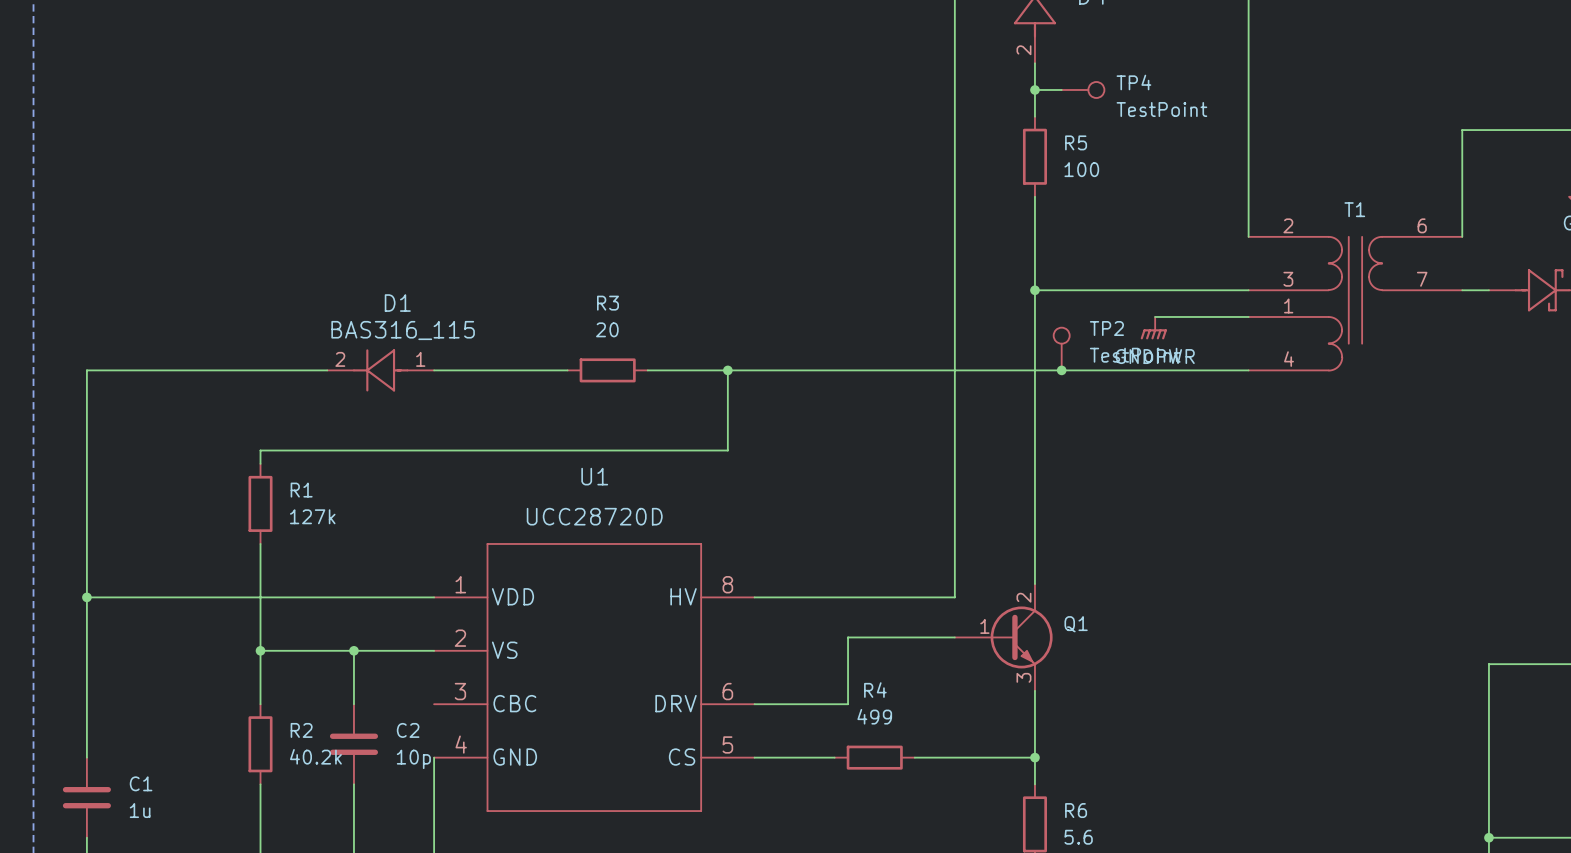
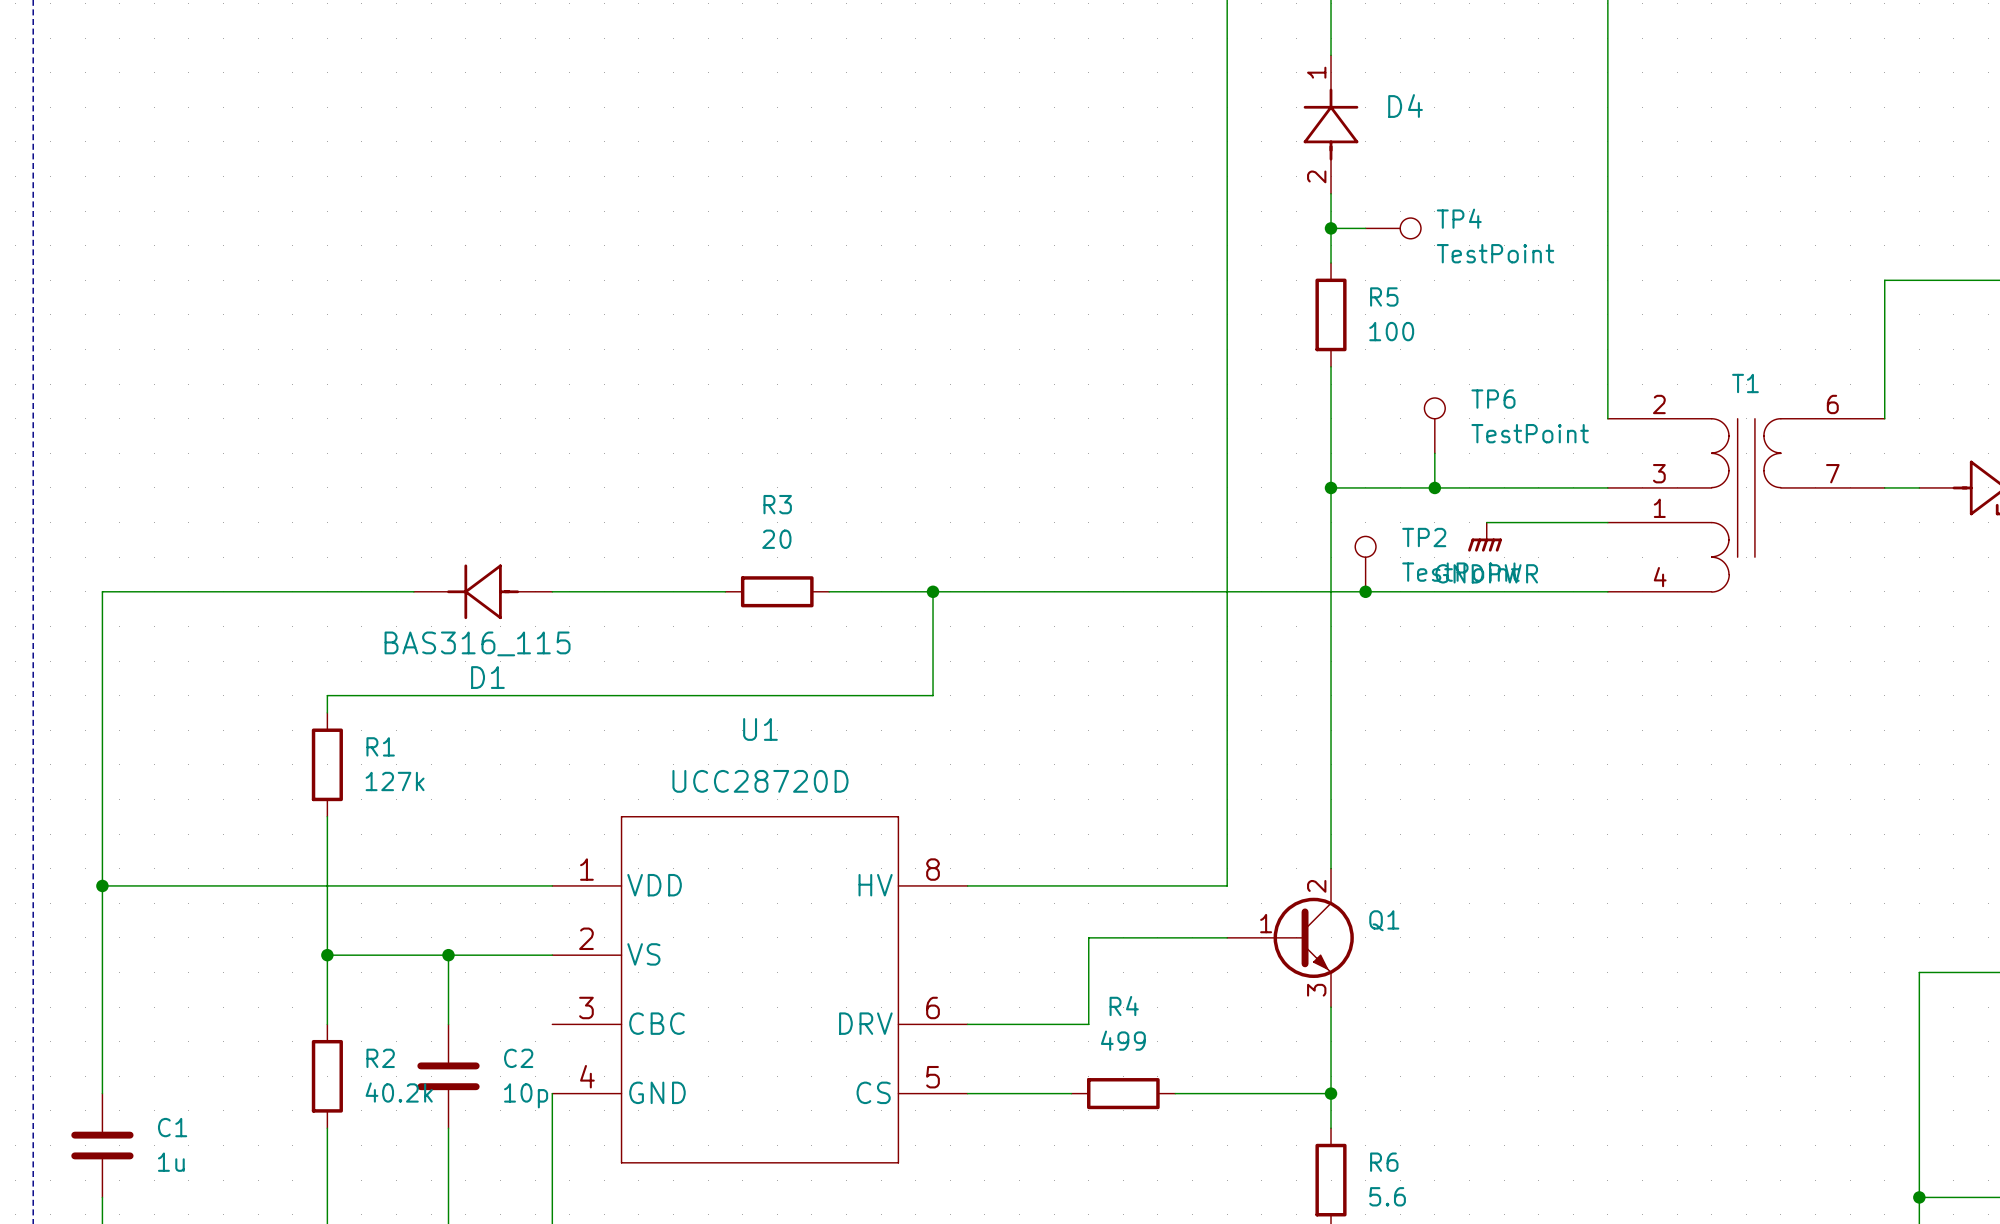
TP6: none -> TestPoint (1434, 425)
wire: none -> (1434, 453) (1434, 487)
junction: none -> (1434, 487)
D1 name position: D1 (397, 303) -> D1 (487, 677)
D1 value position: BAS316_115 (403, 330) -> BAS316_115 (477, 643)
D1 pin number: 2 (340, 359) -> none
D1 pin number: 1 (420, 359) -> none

